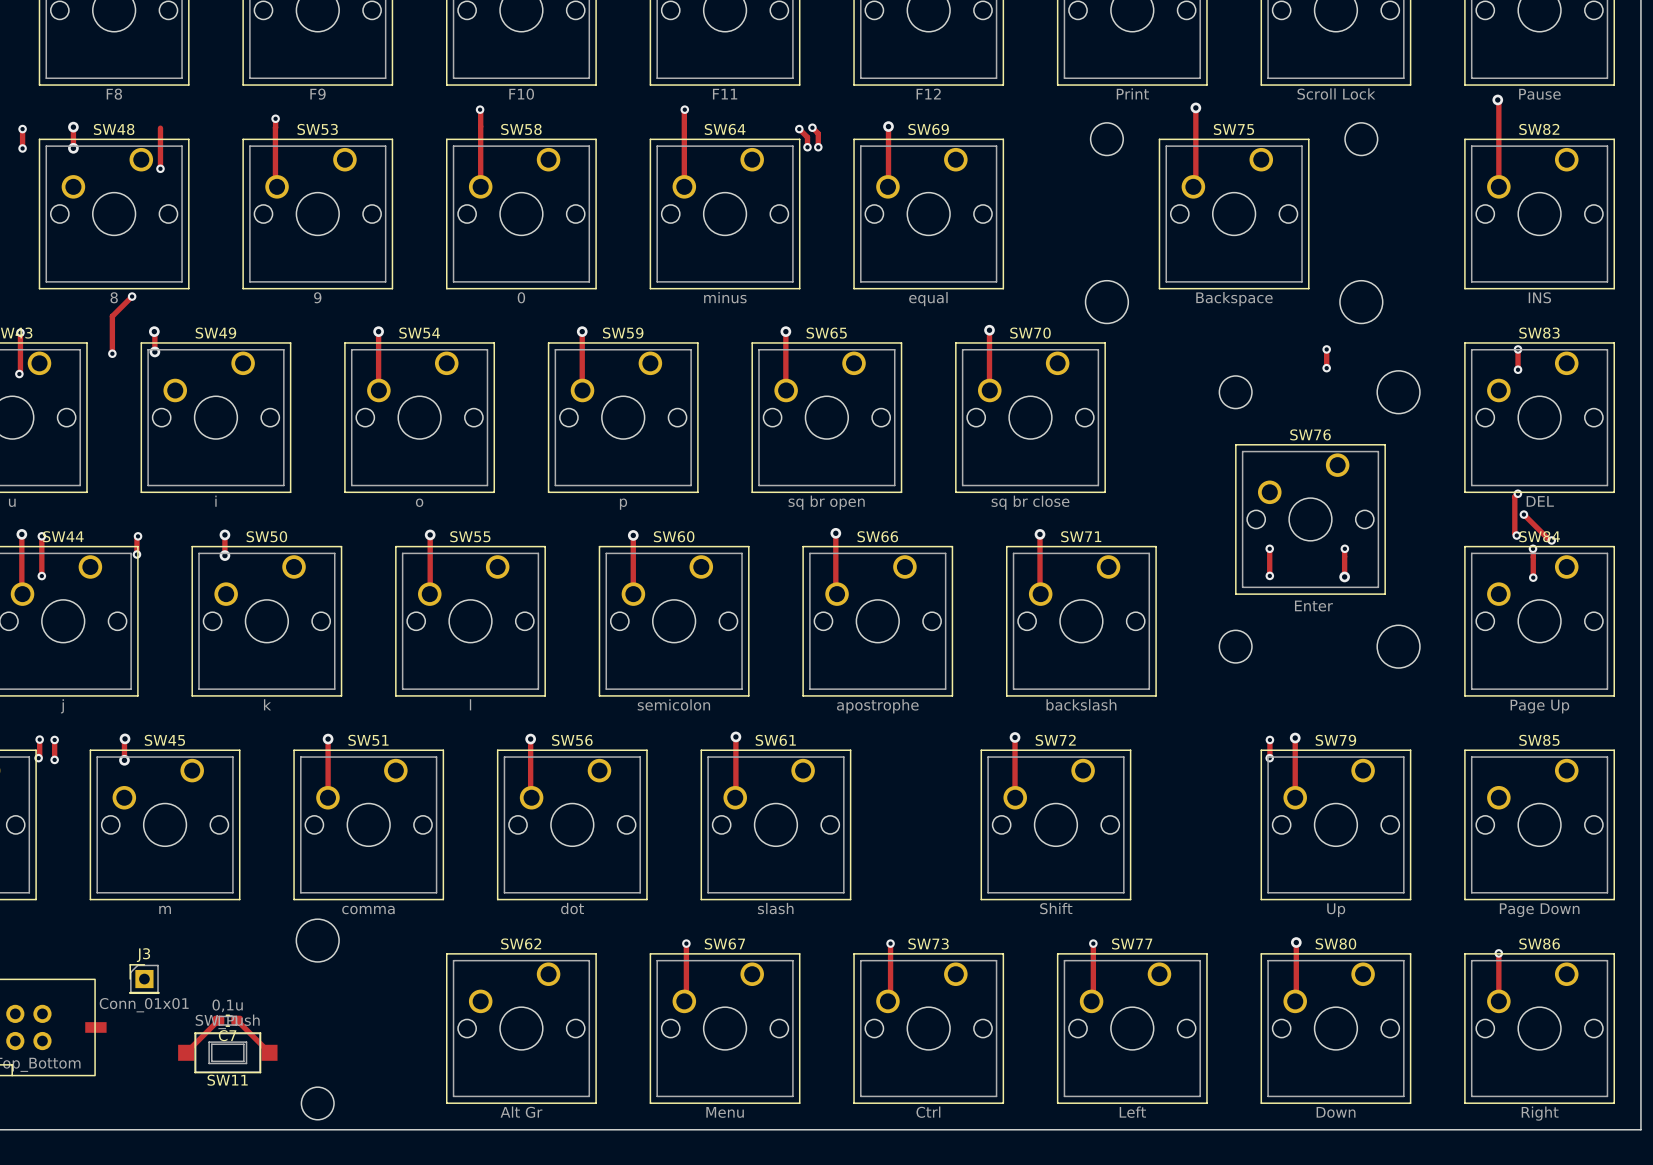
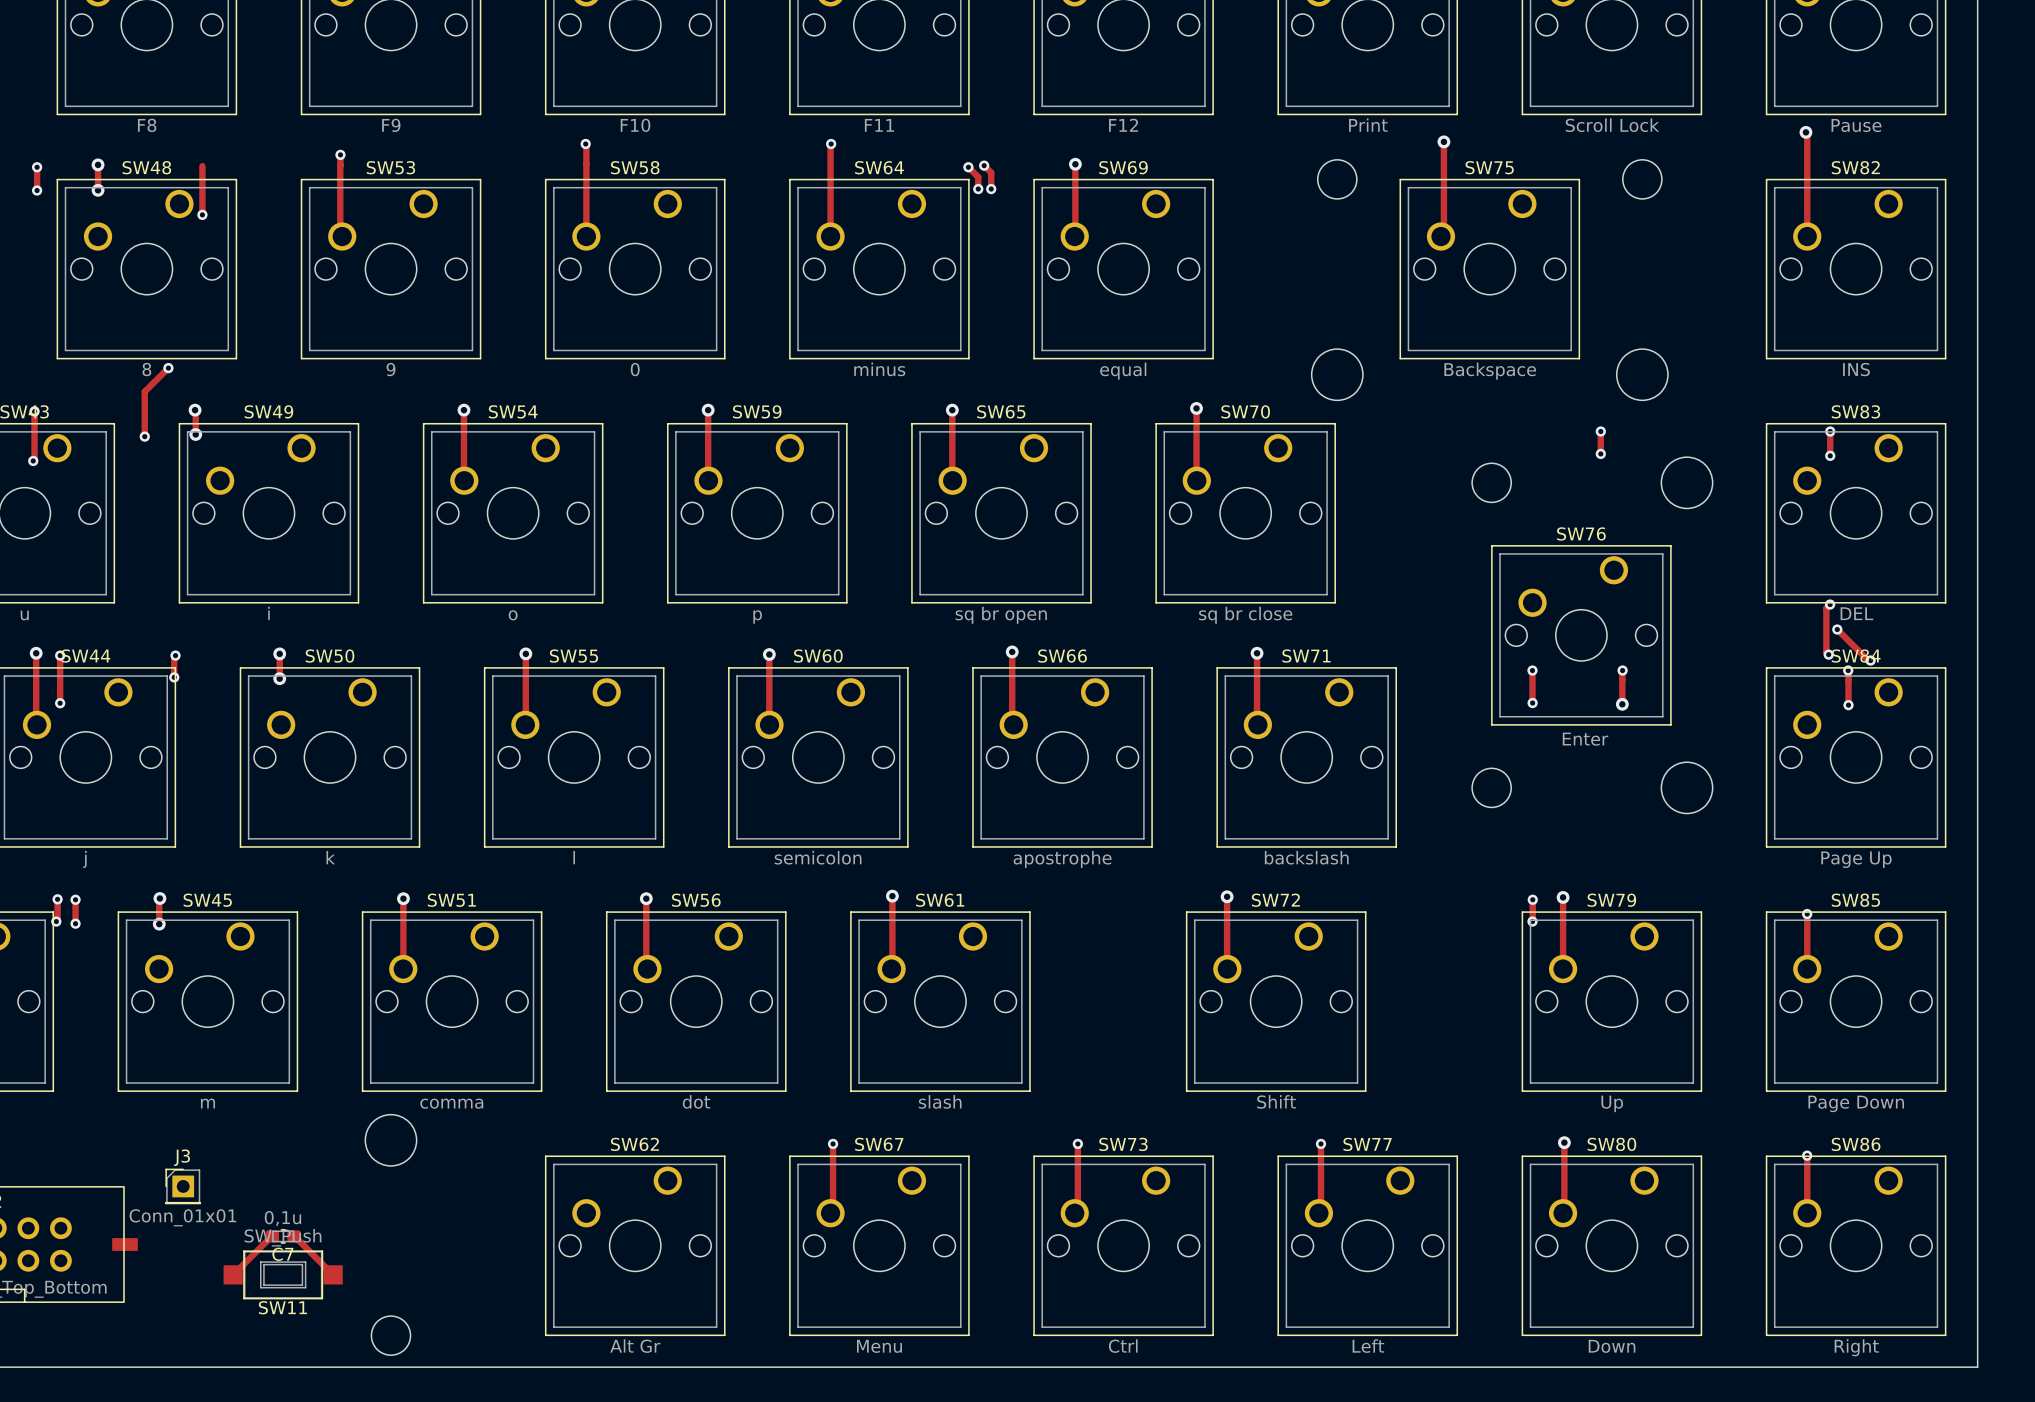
track: none -> (1807, 914) (1807, 969)
via: none -> (1807, 914)

